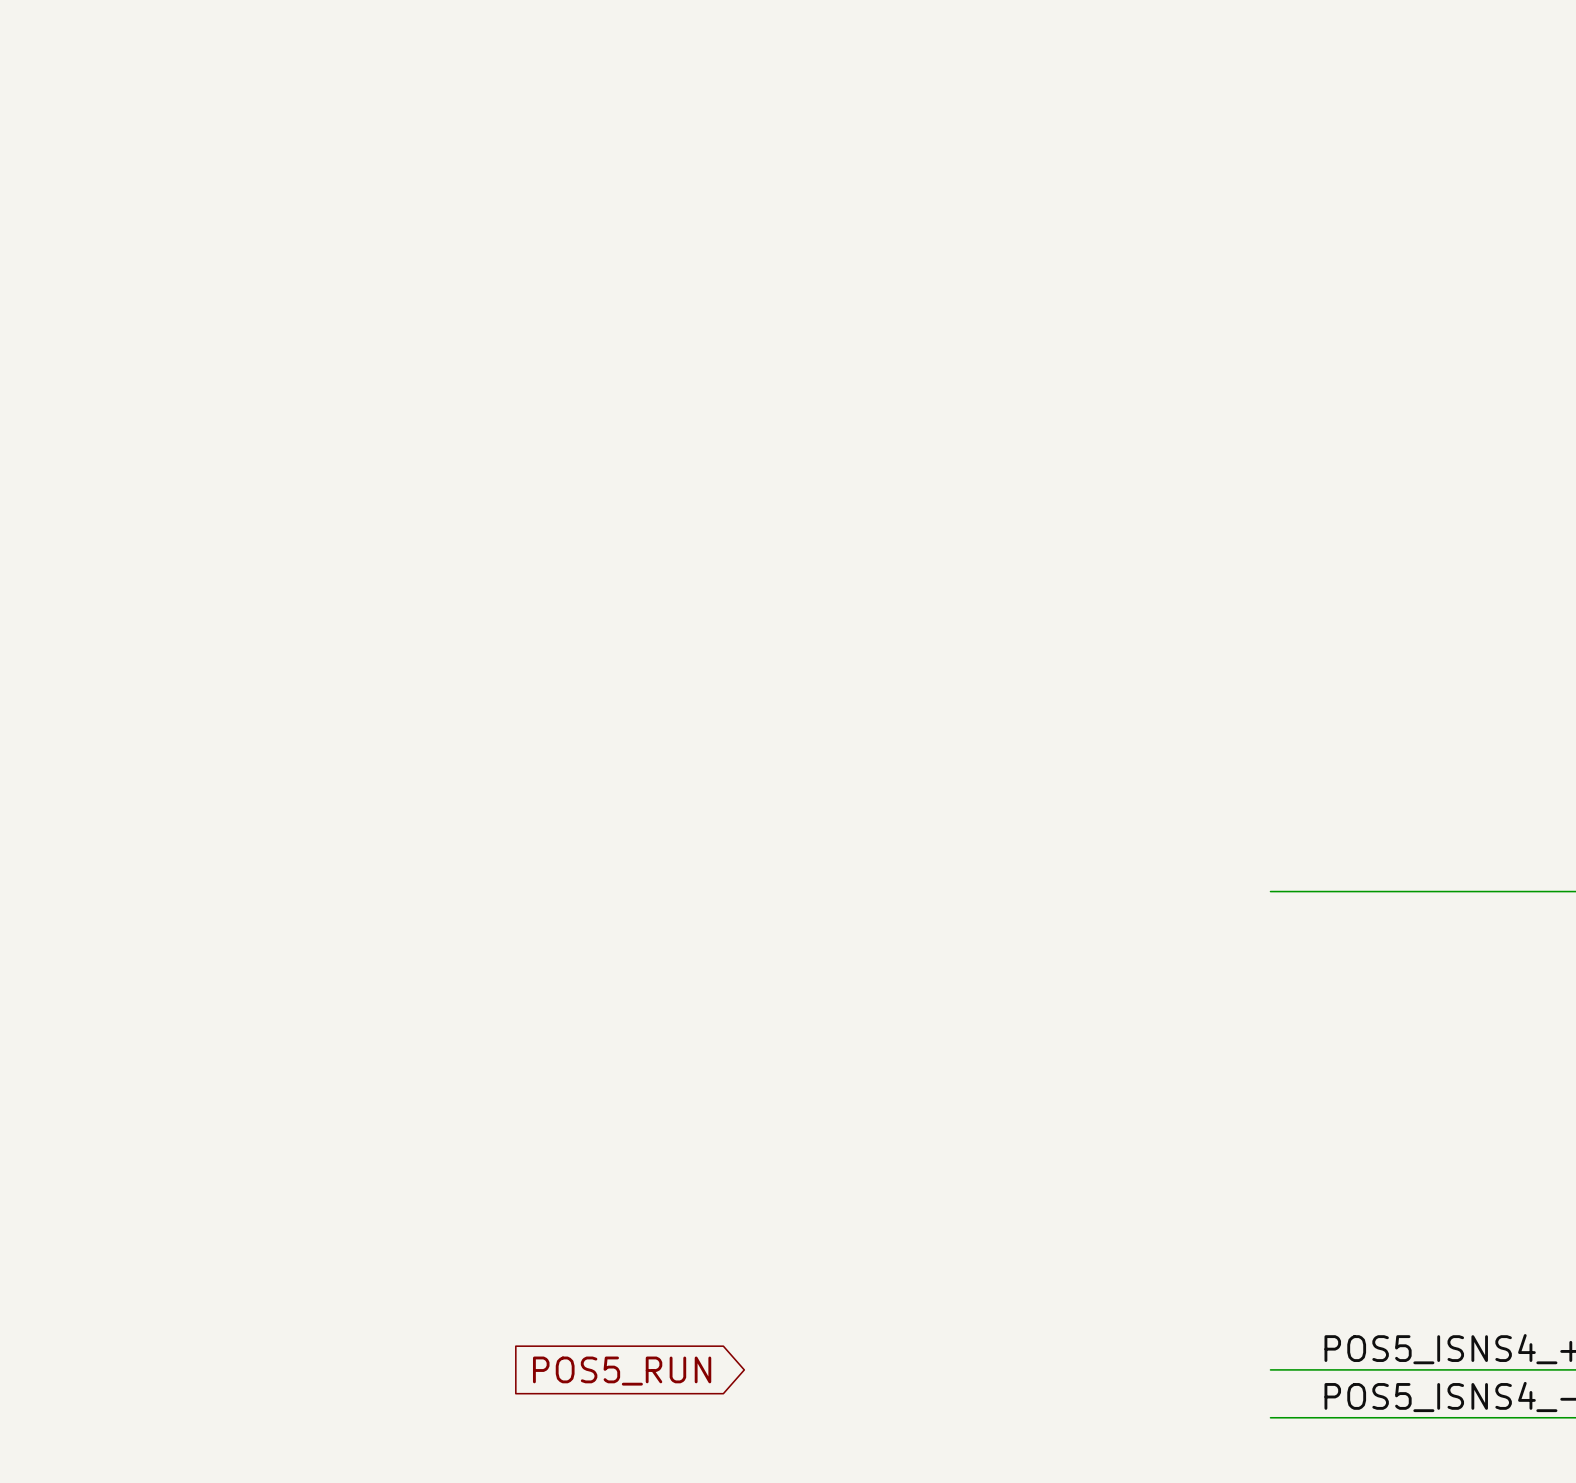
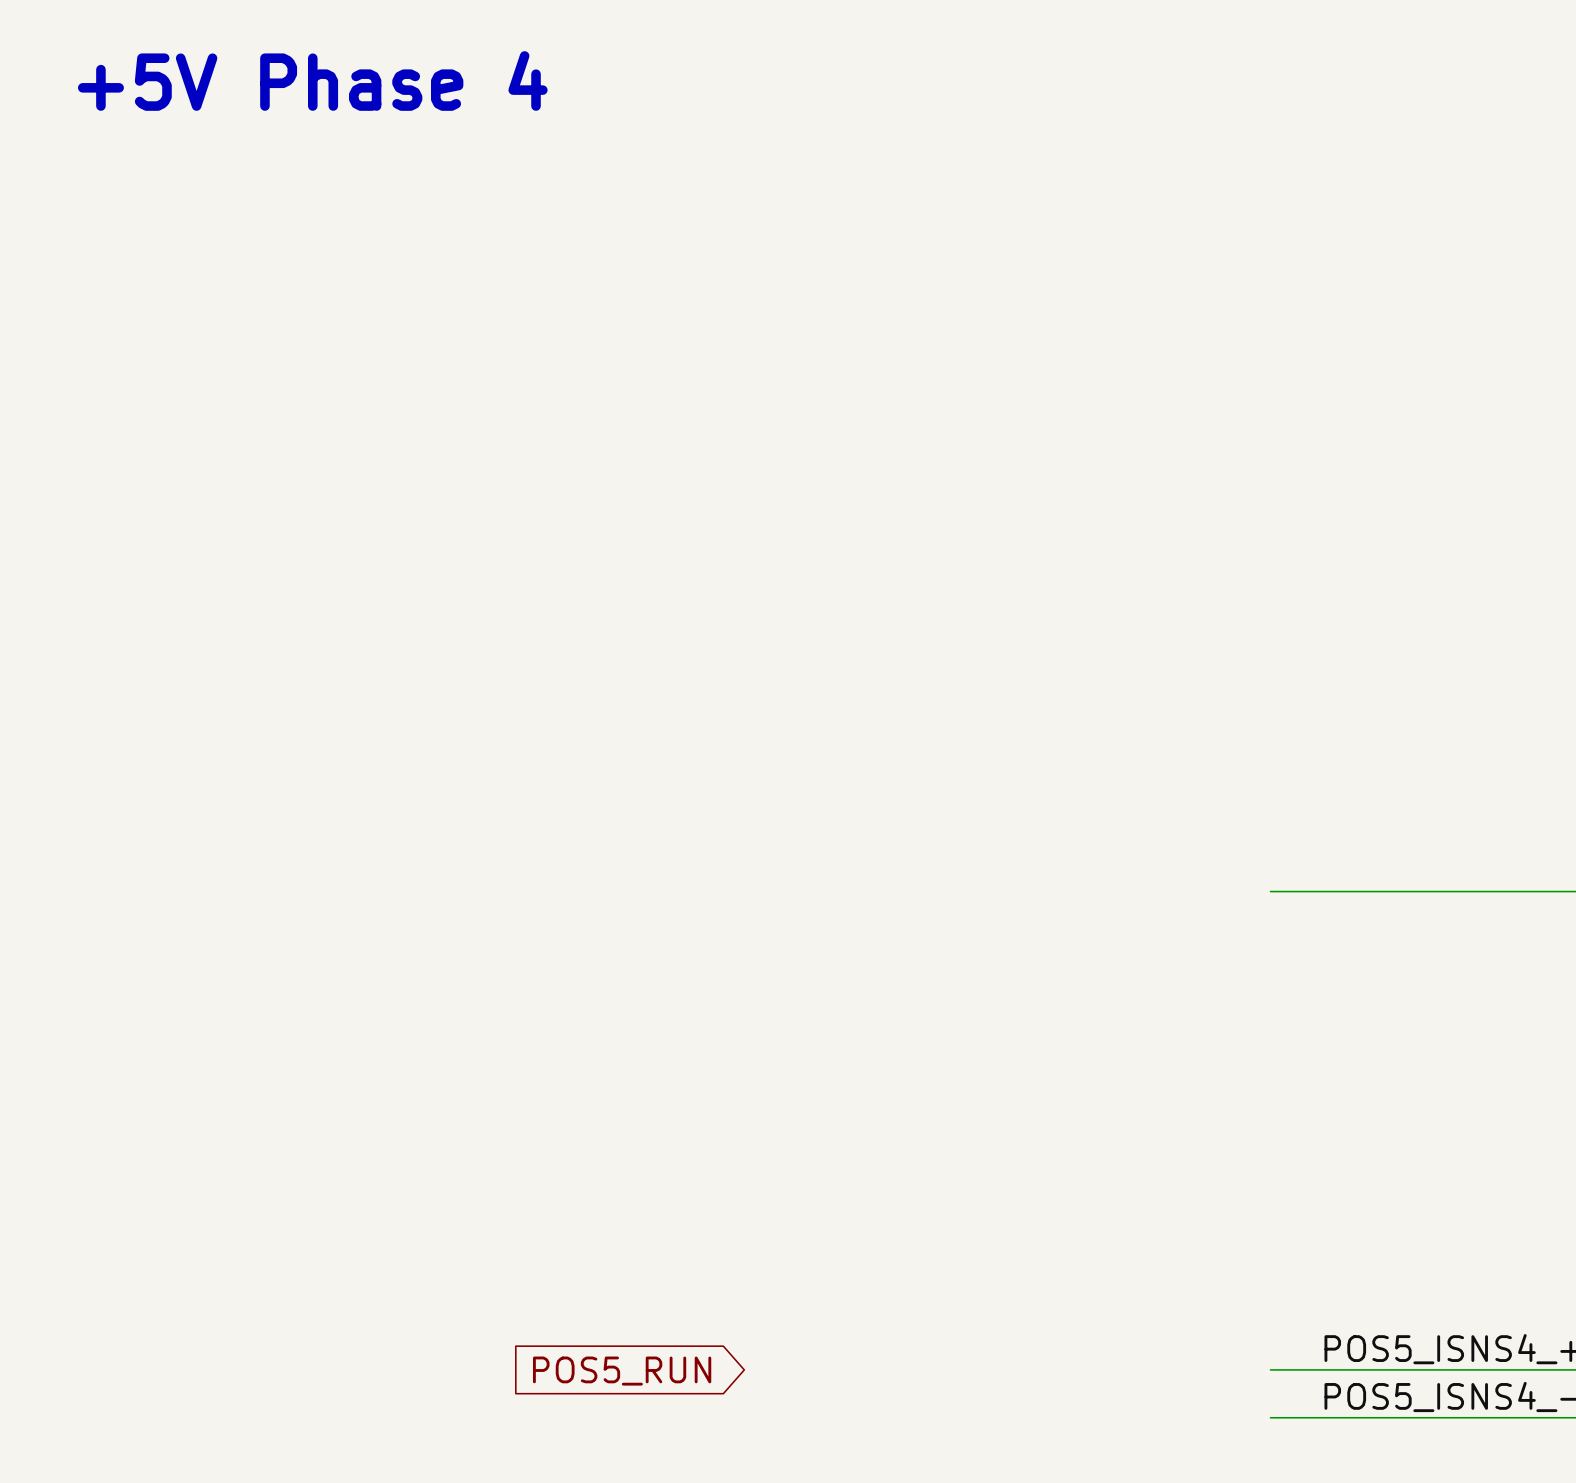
text: none -> +5V Phase 4 (312, 80)

